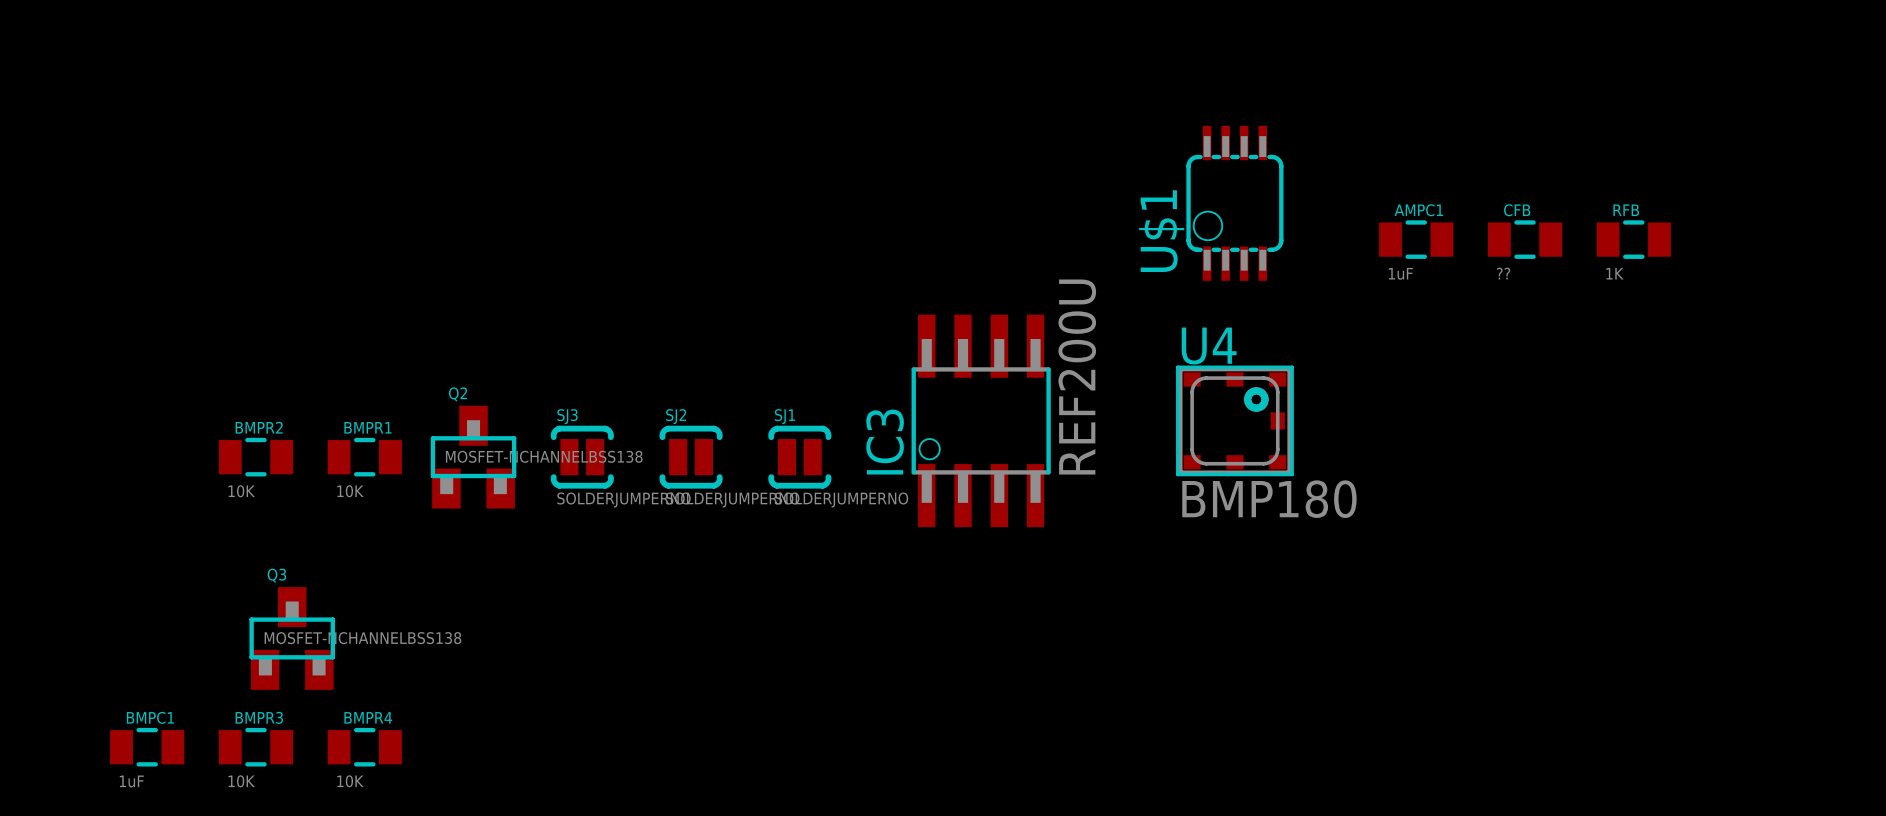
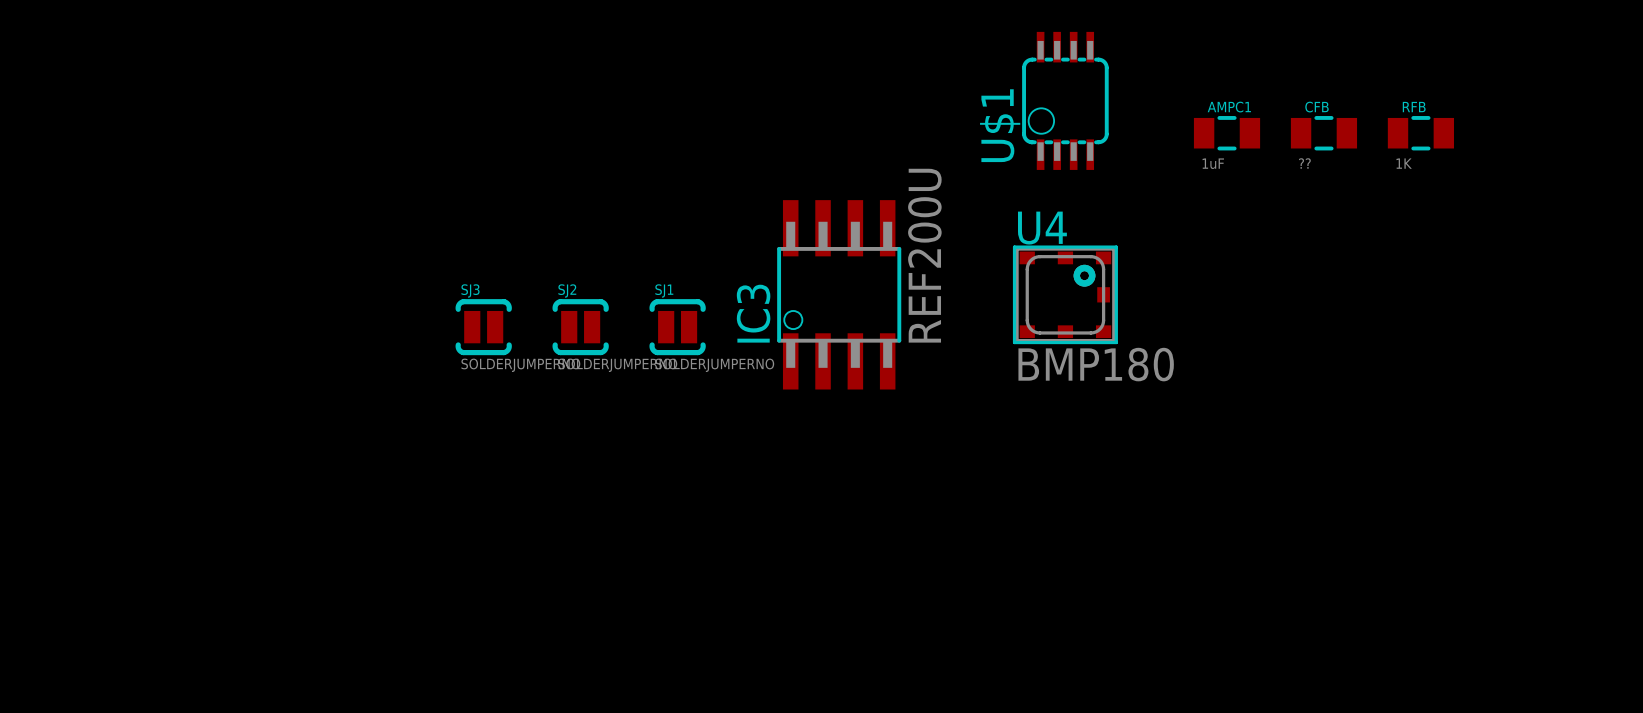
BMPR2: 10K (255, 457) -> none
BMPR1: 10K (364, 457) -> none
Q2: MOSFET-NCHANNELBSS138 (473, 457) -> none
Q3: MOSFET-NCHANNELBSS138 (292, 638) -> none
BMPC1: 1uF (147, 747) -> none
BMPR3: 10K (255, 747) -> none
BMPR4: 10K (364, 747) -> none

